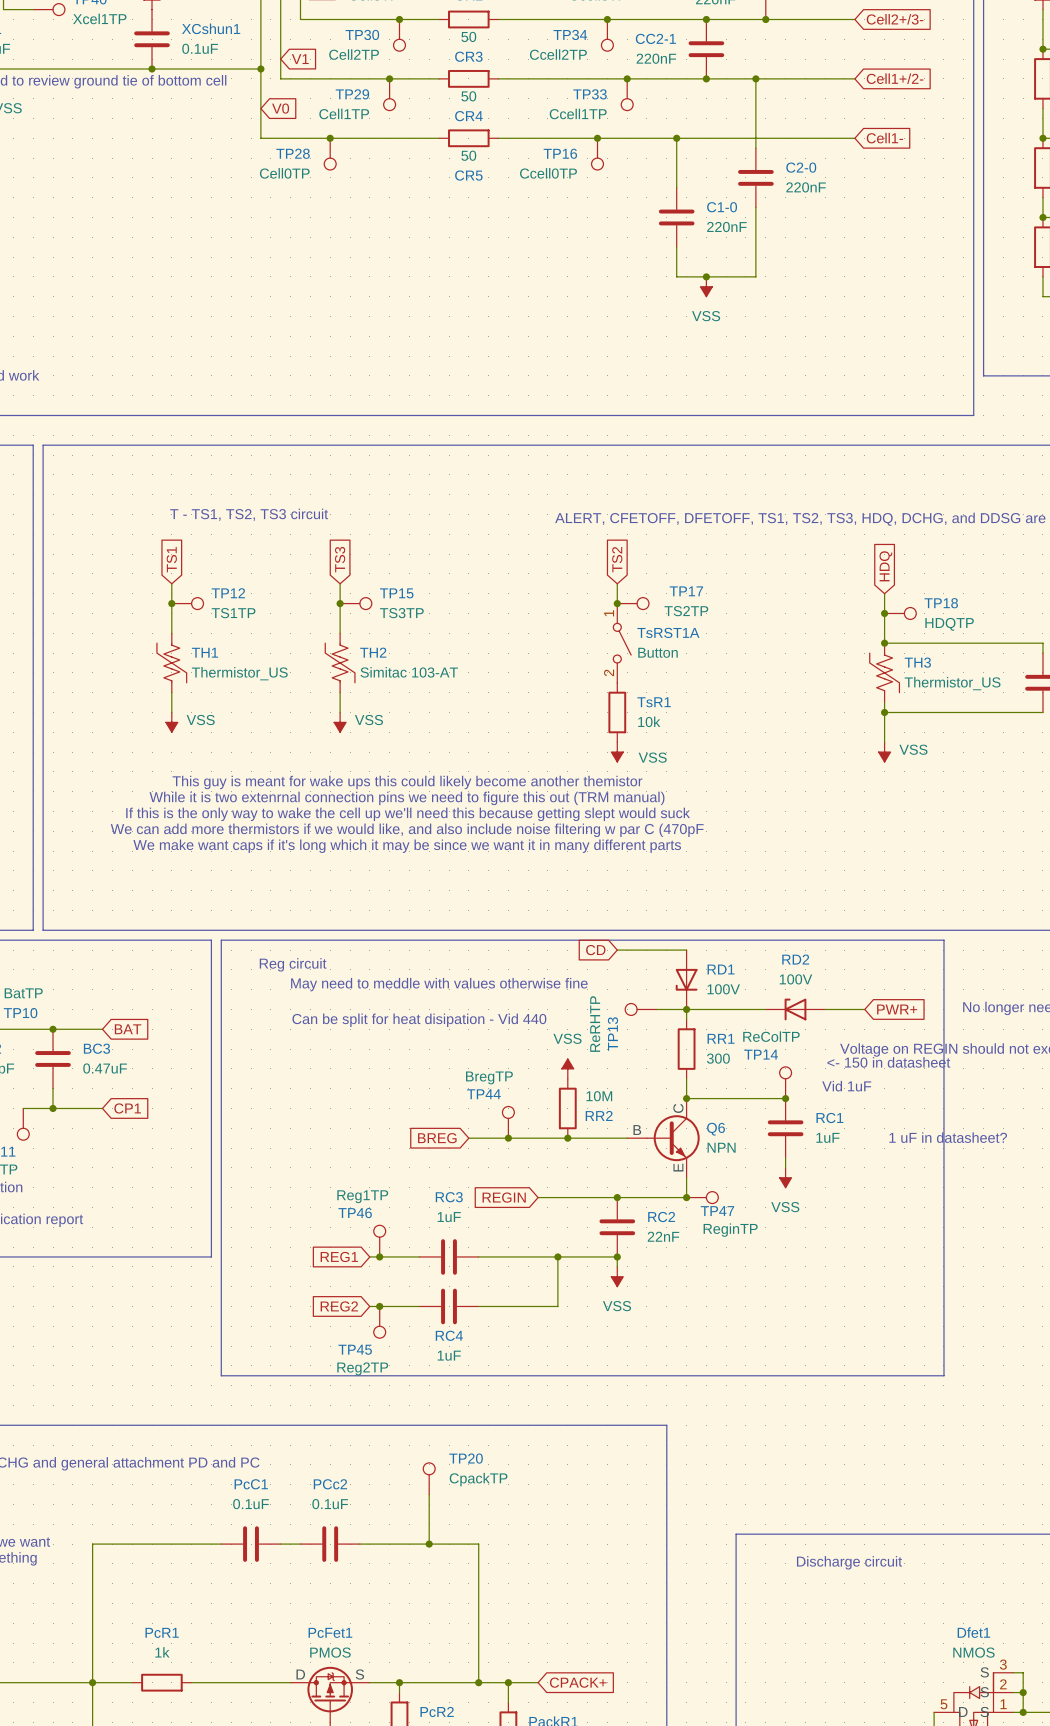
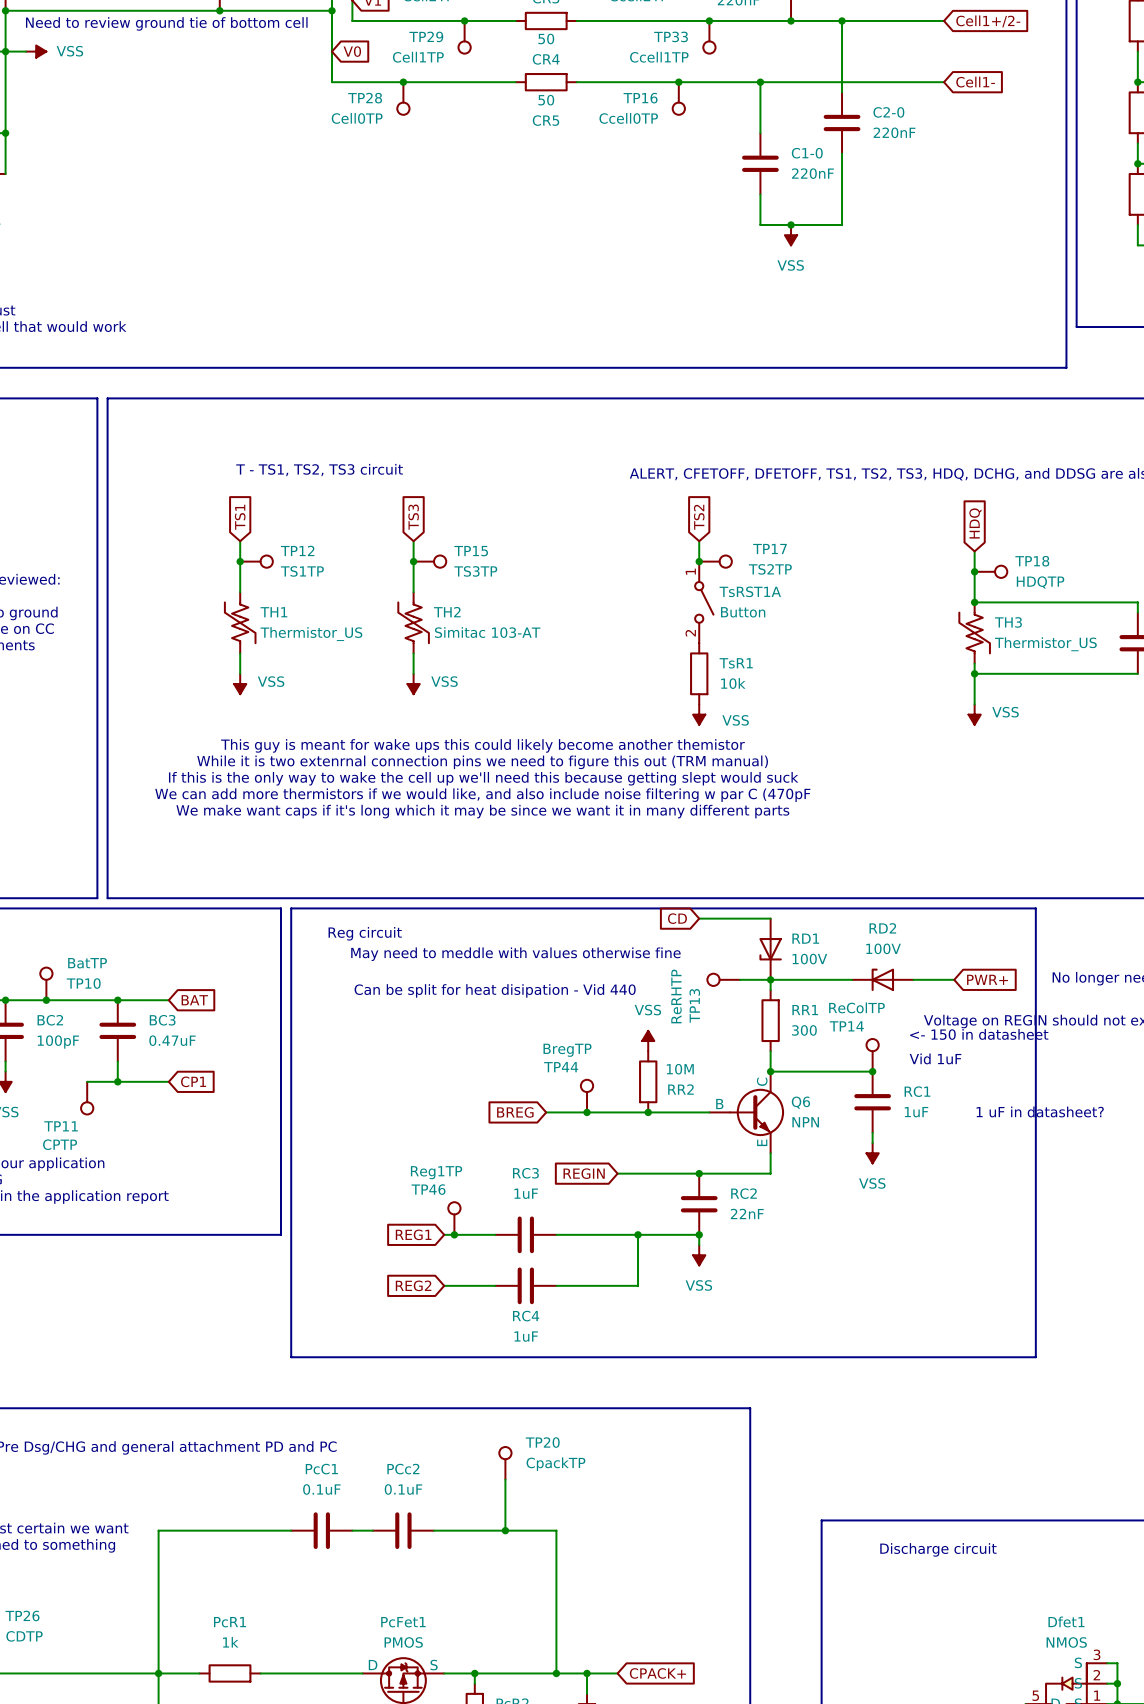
junction: (686, 1197) -> none
TP47: ReginTP (702, 1197) -> none
junction: (379, 1306) -> none
TP45: Reg2TP (379, 1322) -> none

